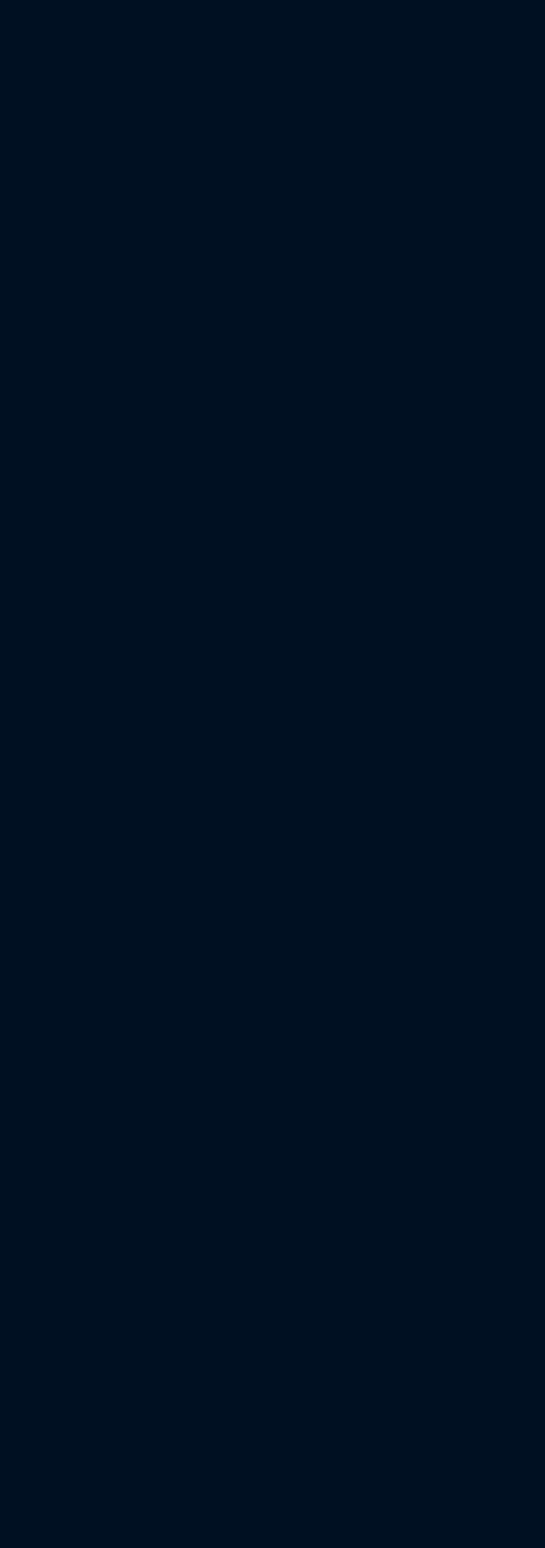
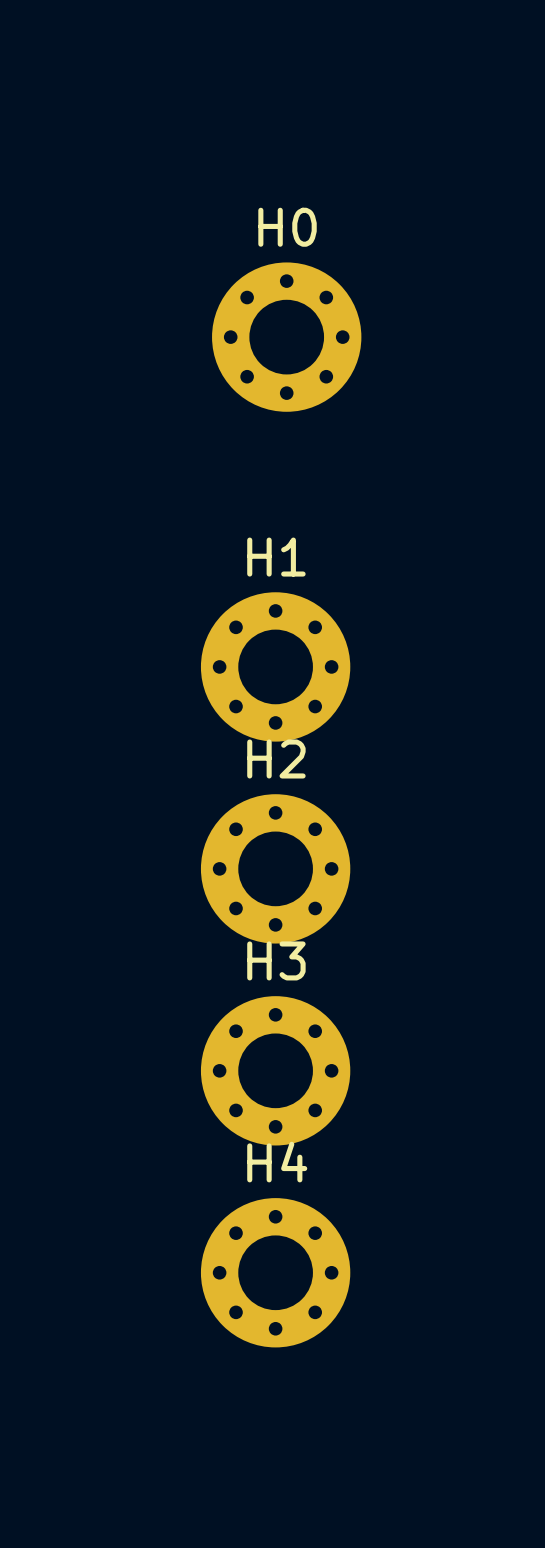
H0: none -> (286, 337)
H1: none -> (275, 666)
H2: none -> (275, 868)
H3: none -> (275, 1070)
H4: none -> (275, 1272)

